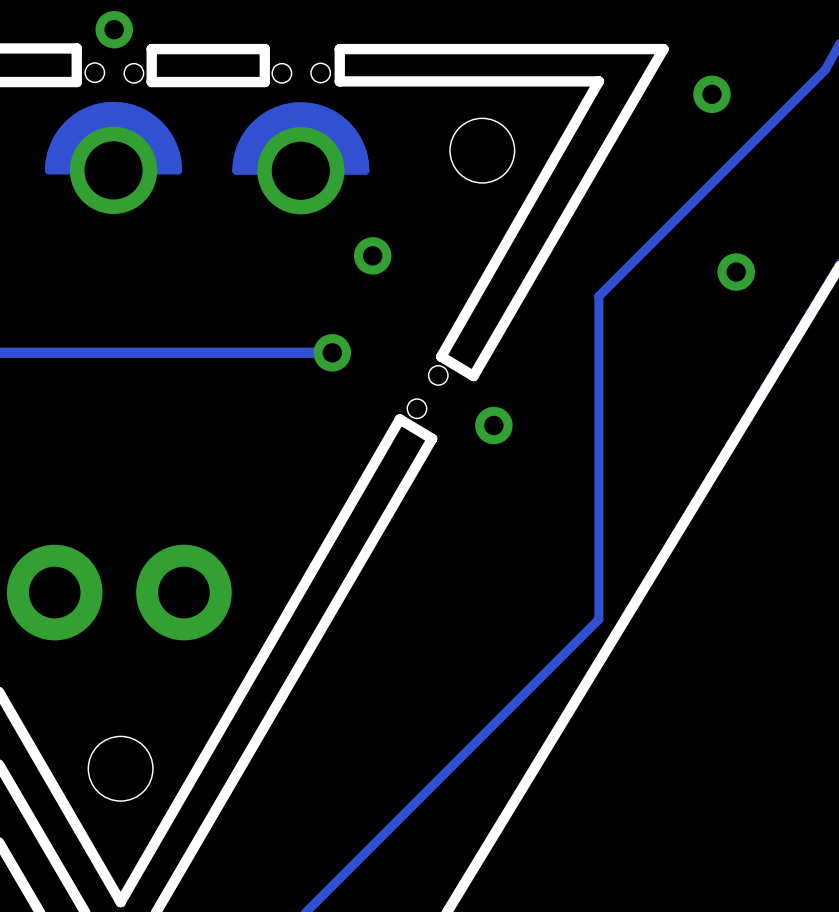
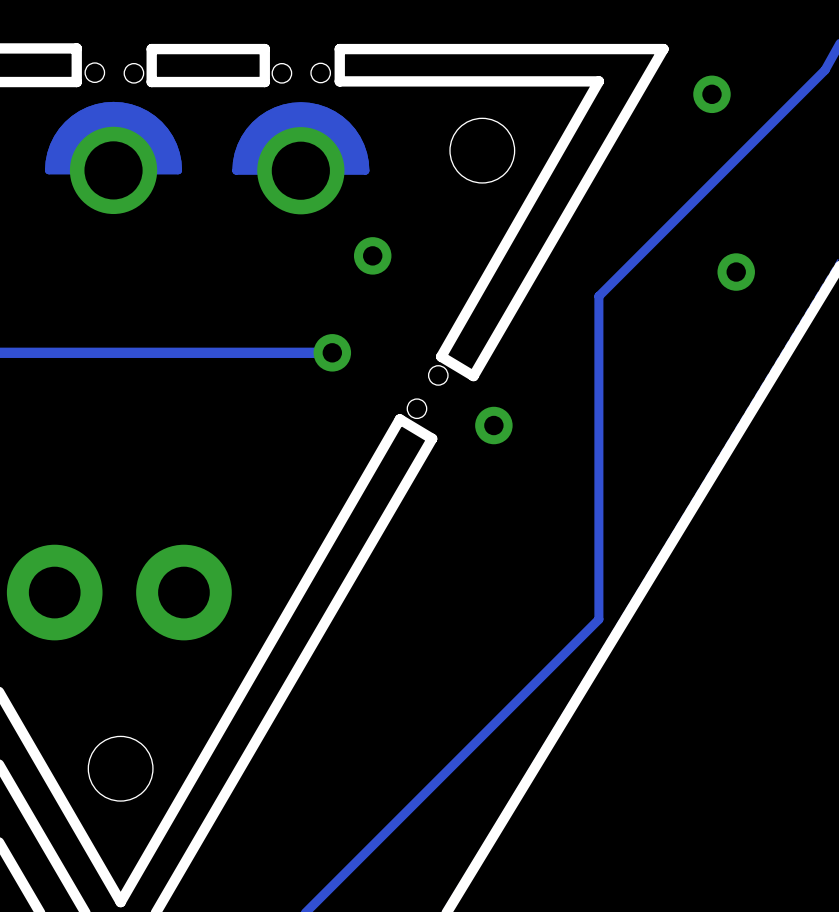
via: (114, 29) -> none

